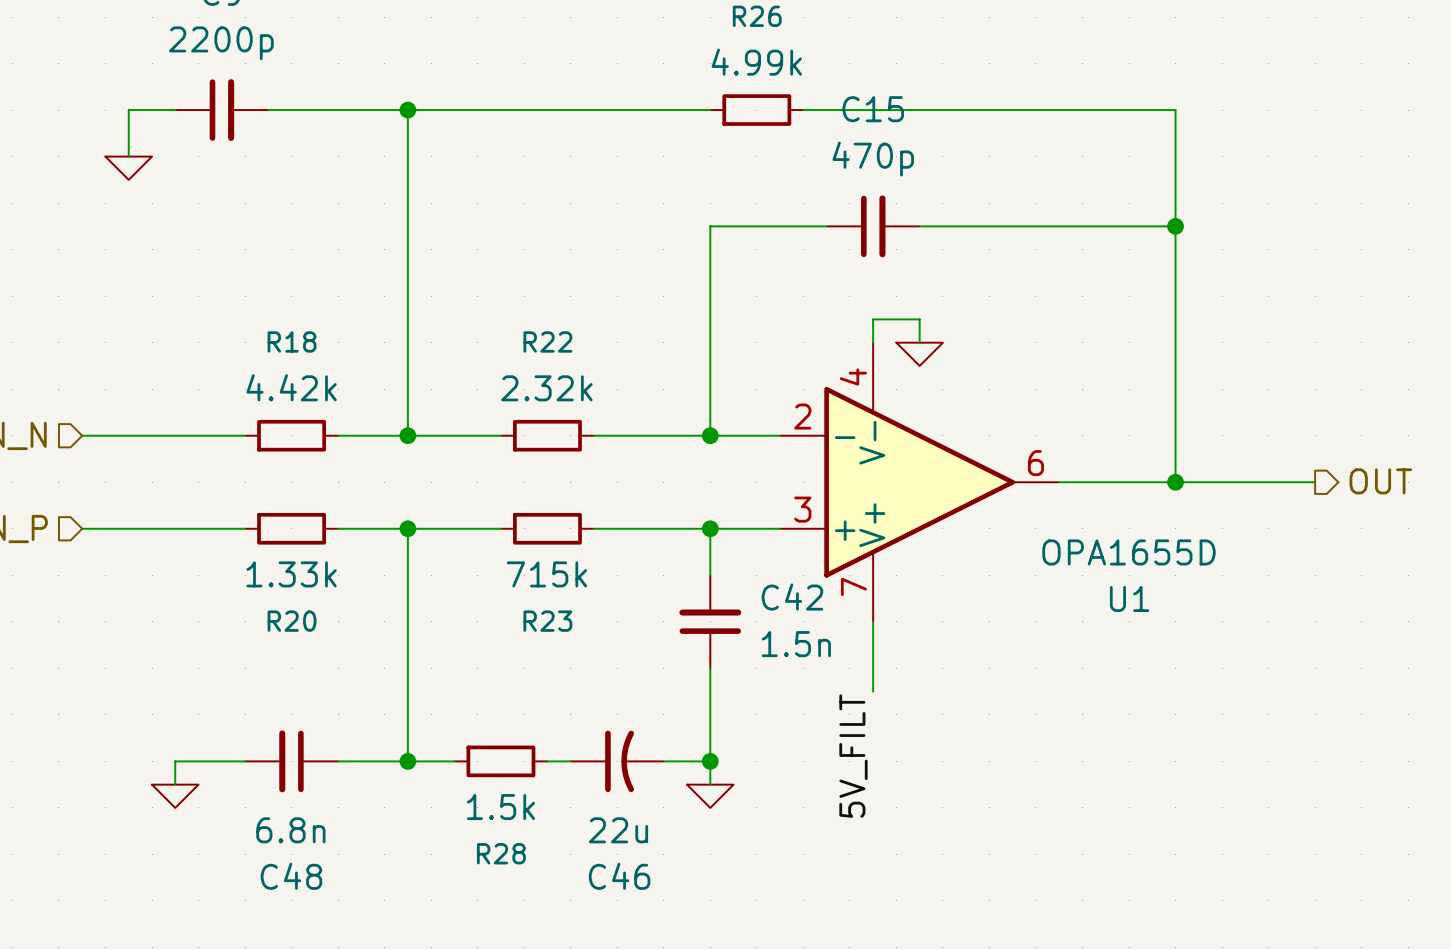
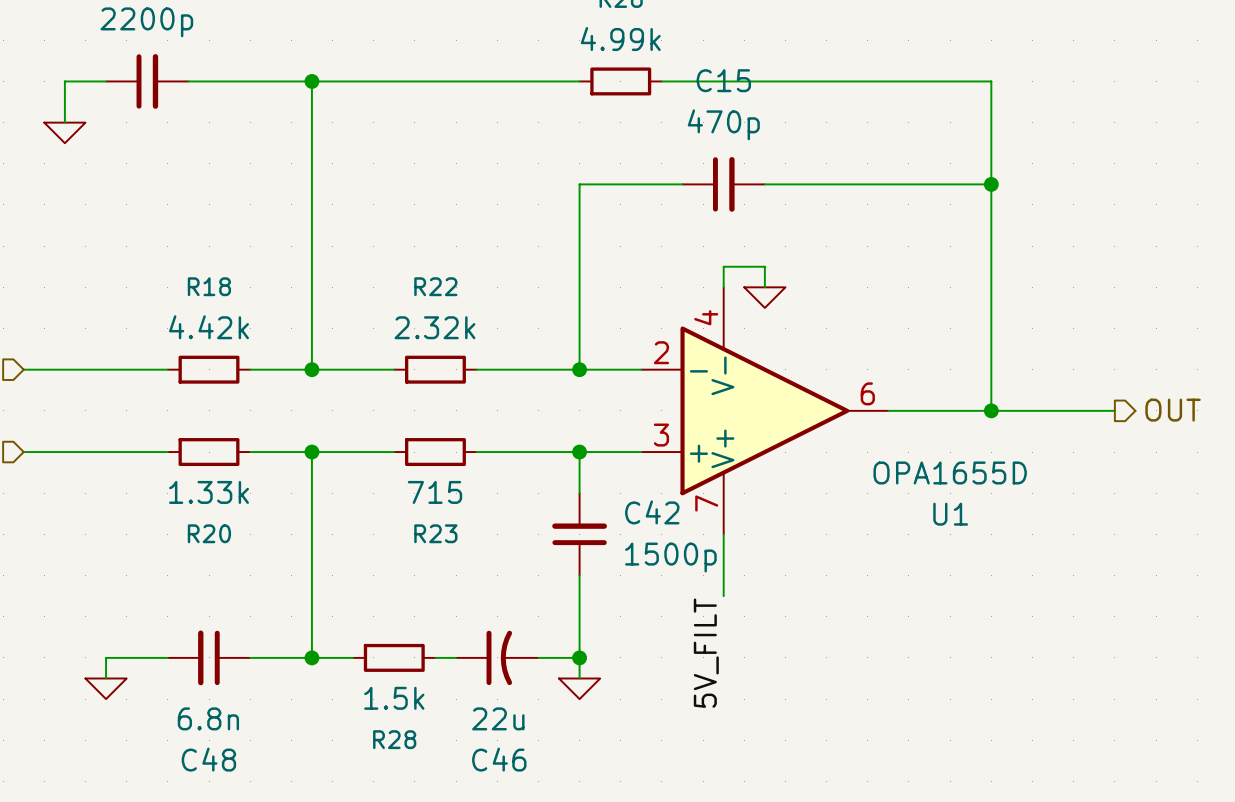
R23 value: 715k (546, 574) -> 715 (434, 492)
C42 value: 1.5n (796, 644) -> 1500p (670, 557)

